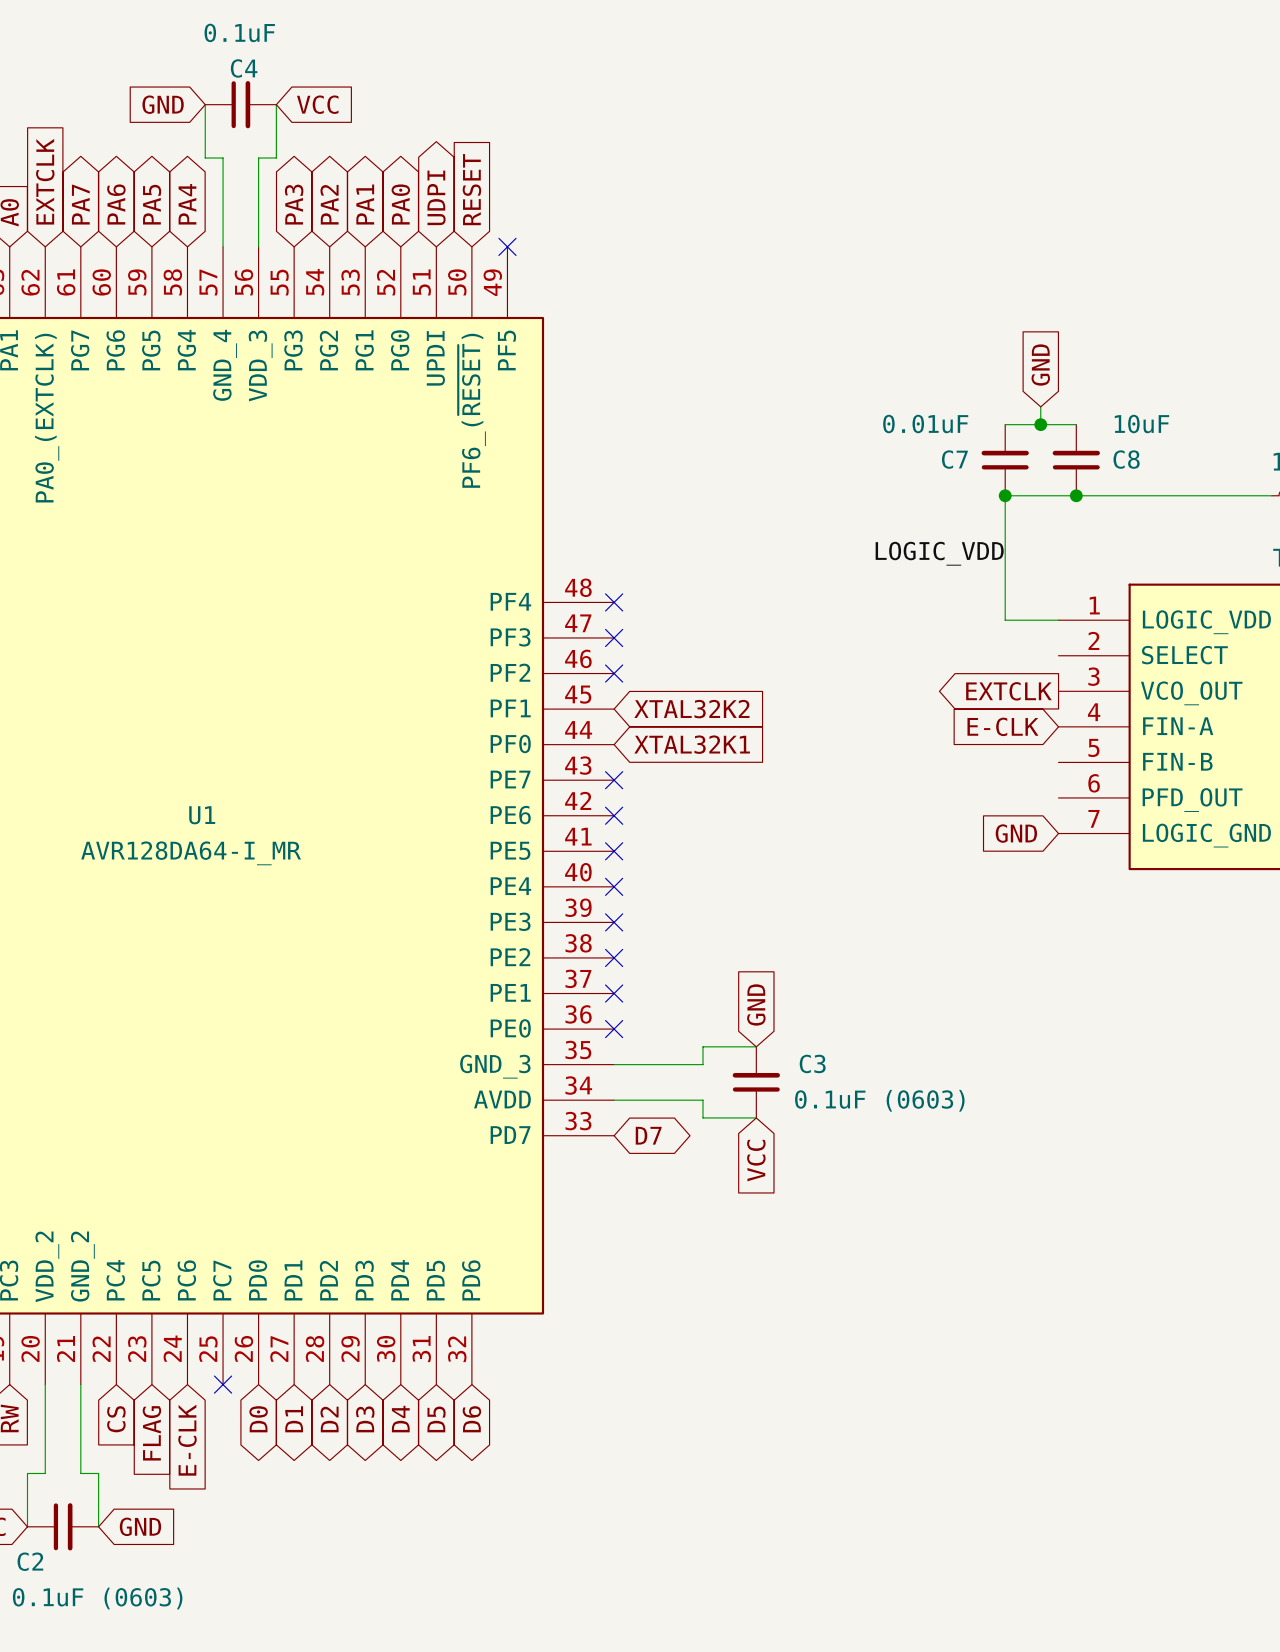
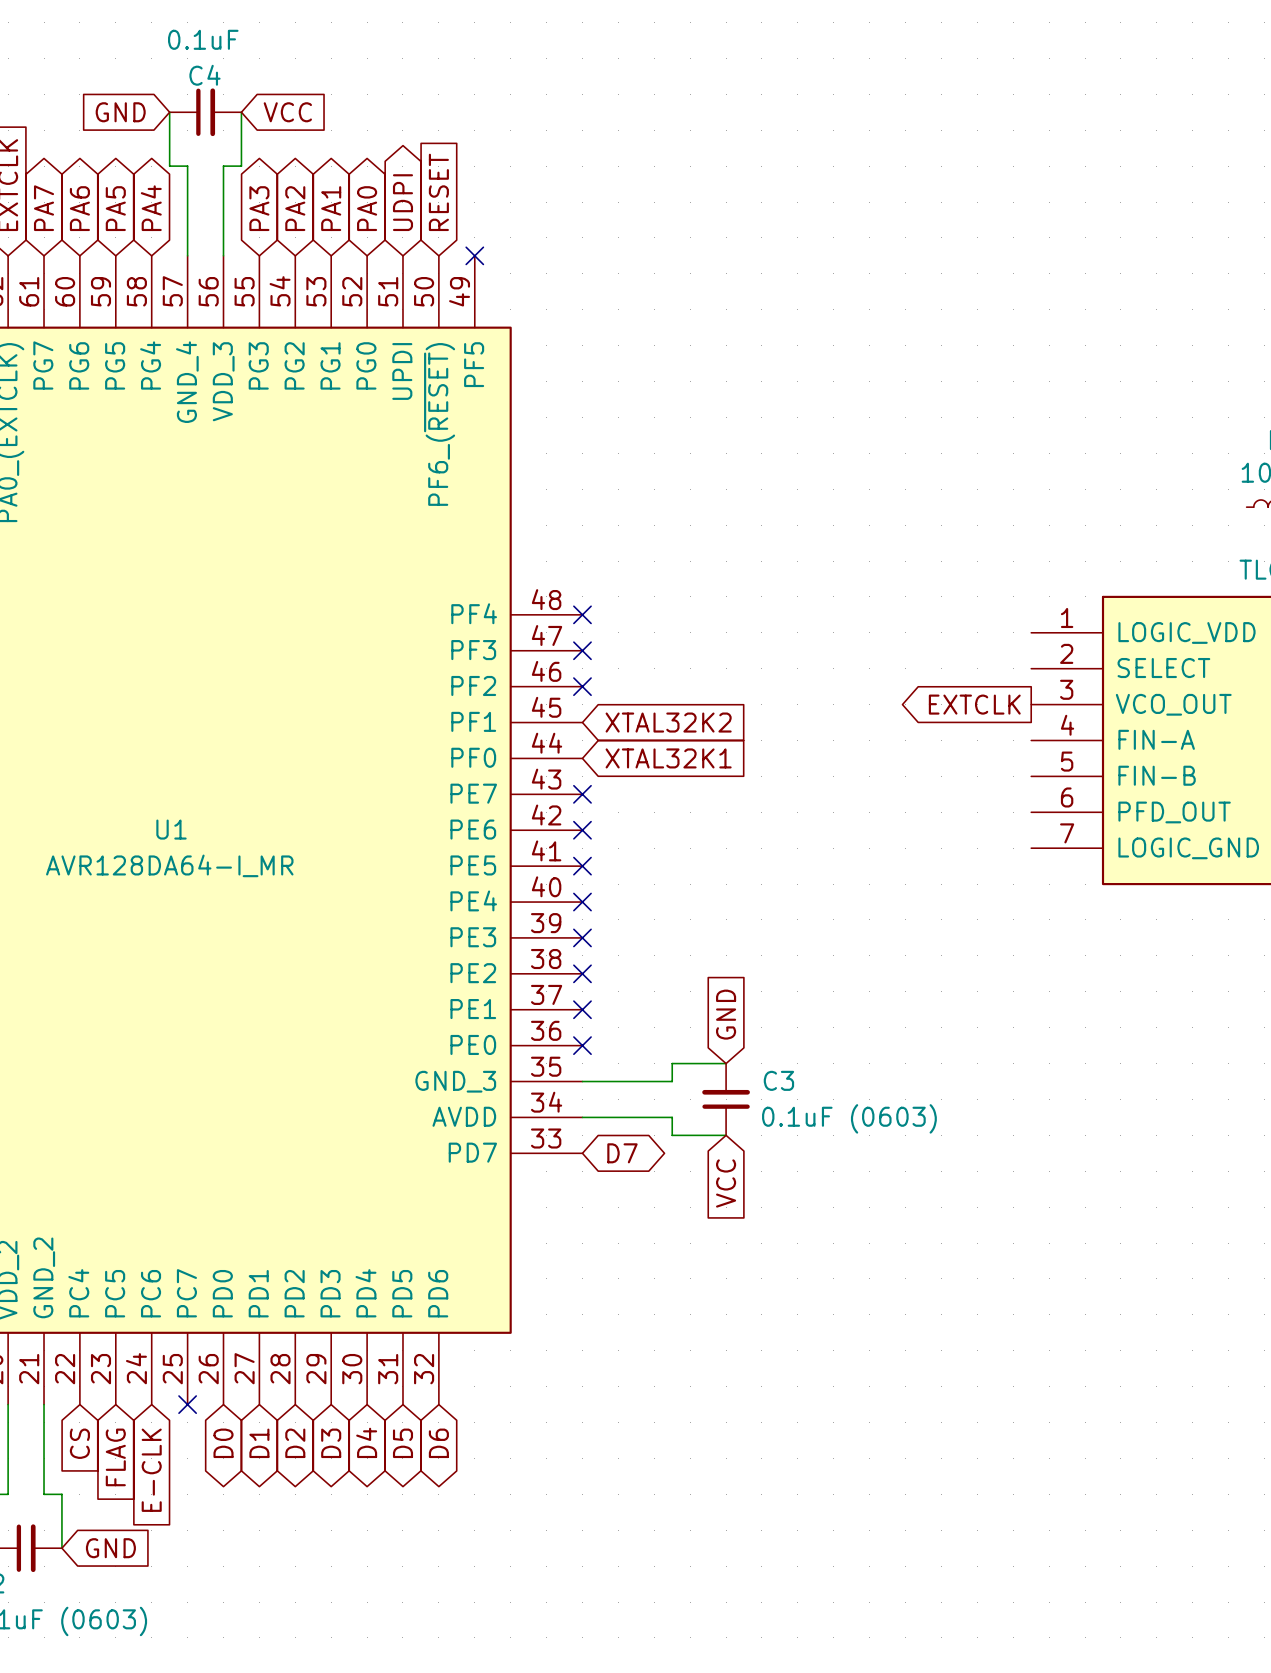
global label: GND (1040, 365) -> none
wire: (1040, 406) (1040, 424) -> none
wire: (1005, 424) (1076, 424) -> none
junction: (1040, 424) -> none
C7: 0.01uF (1005, 460) -> none
C8: 10uF (1076, 460) -> none
junction: (1005, 495) -> none
junction: (1076, 495) -> none
wire: (1271, 495) (1005, 495) (1005, 620) (1058, 620) -> none
label: LOGIC_VDD (939, 553) -> none
global label: E-CLK (1002, 726) -> none
global label: GND (1016, 833) -> none

